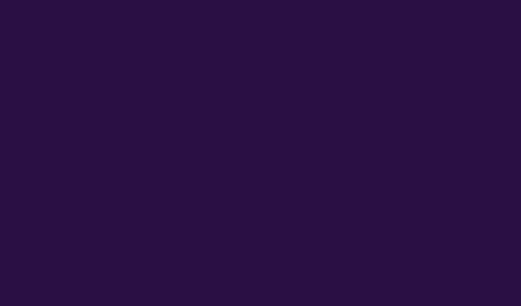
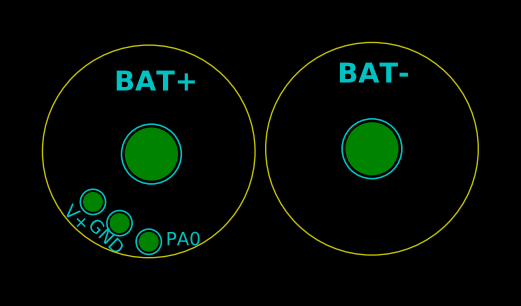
round board edge: none -> [265, 41, 479, 256]
round board edge: none -> [41, 44, 256, 259]
text: none -> BAT- (373, 72)
text: none -> BAT+ (155, 80)
part: none -> (371, 148)
part: none -> (151, 154)
part: none -> V+ (92, 201)
part: none -> GND (119, 223)
part: none -> PA0 (148, 241)

